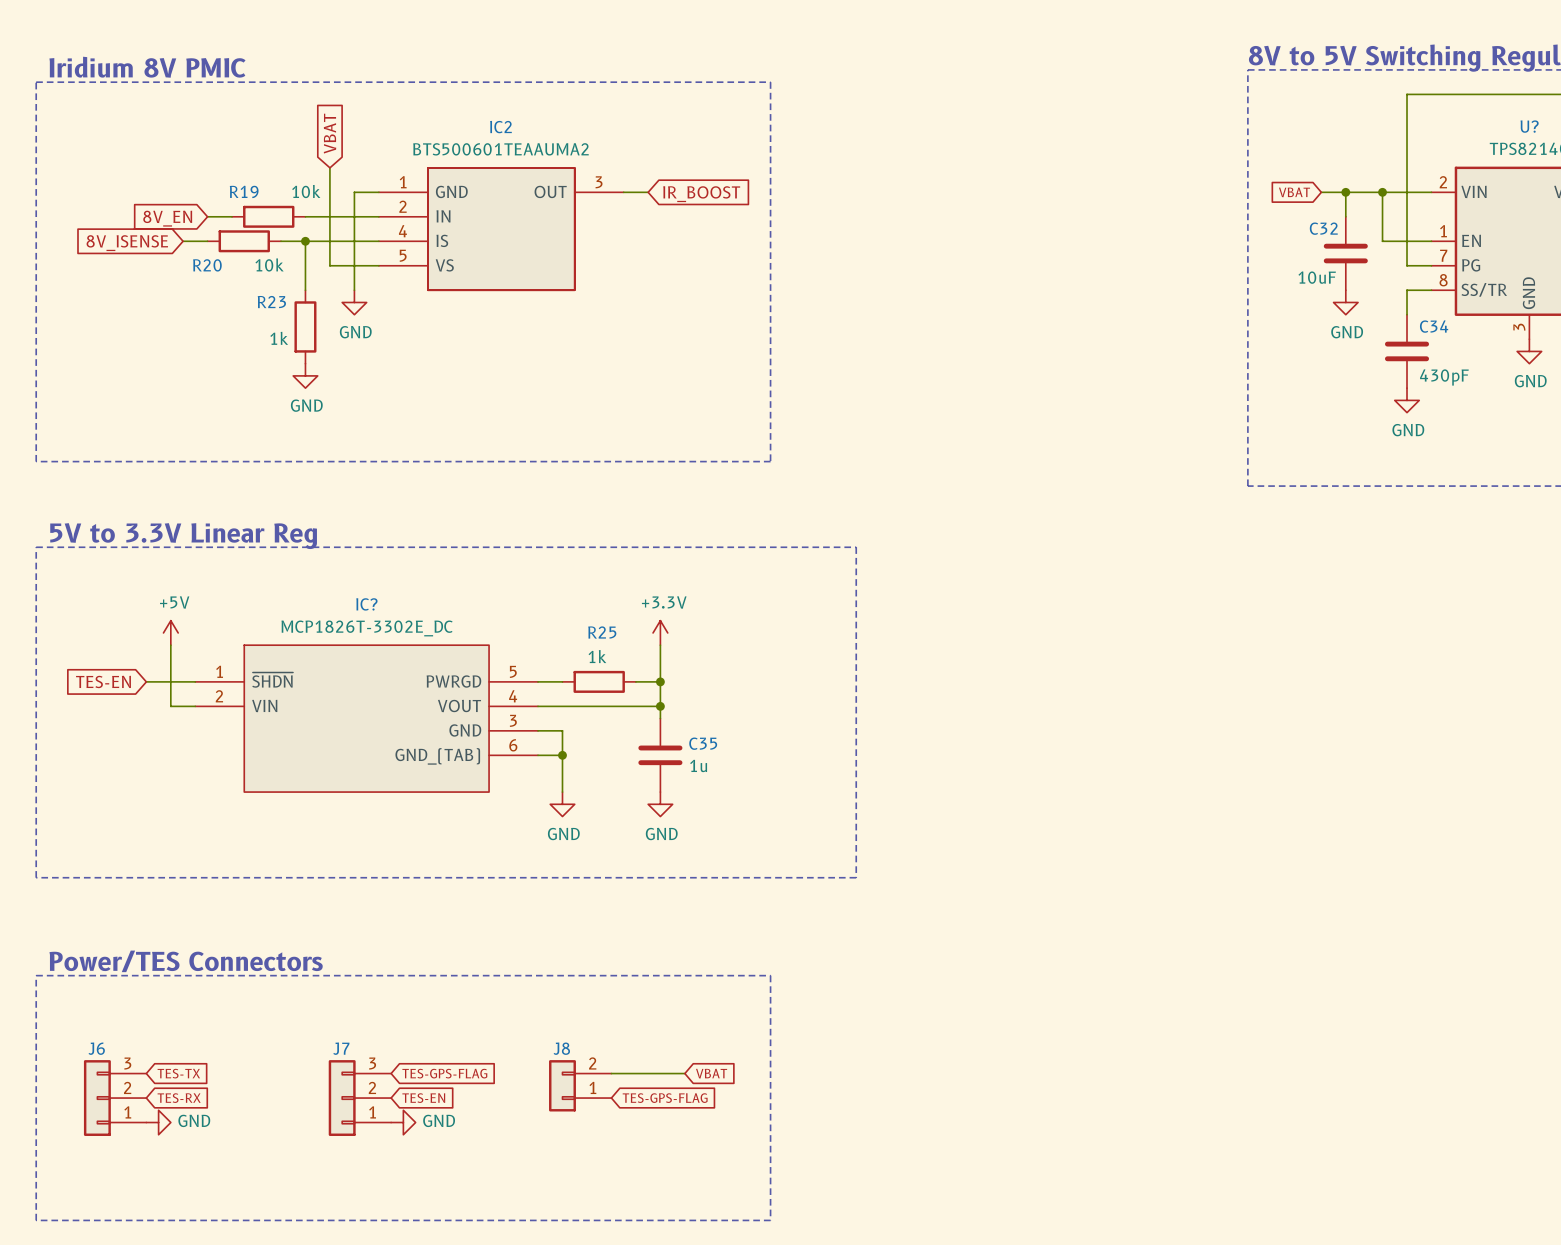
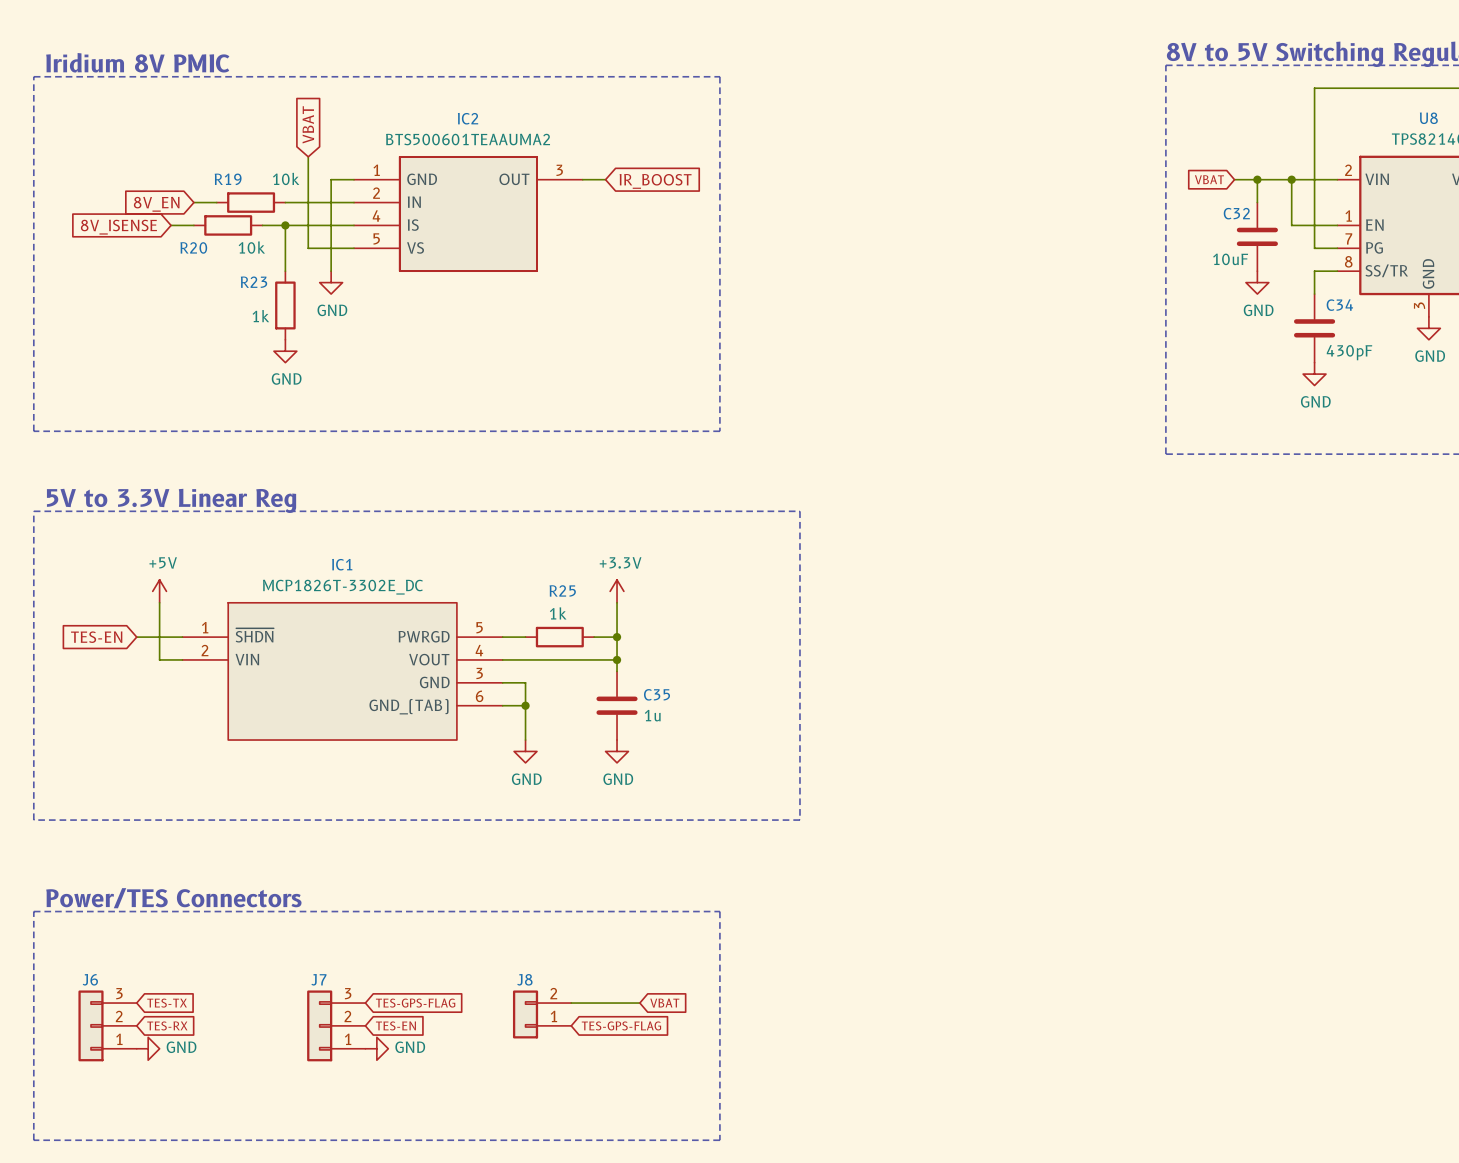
U? name: U? (1529, 126) -> U8 (1428, 118)
IC? name: IC? (366, 604) -> IC1 (342, 564)

